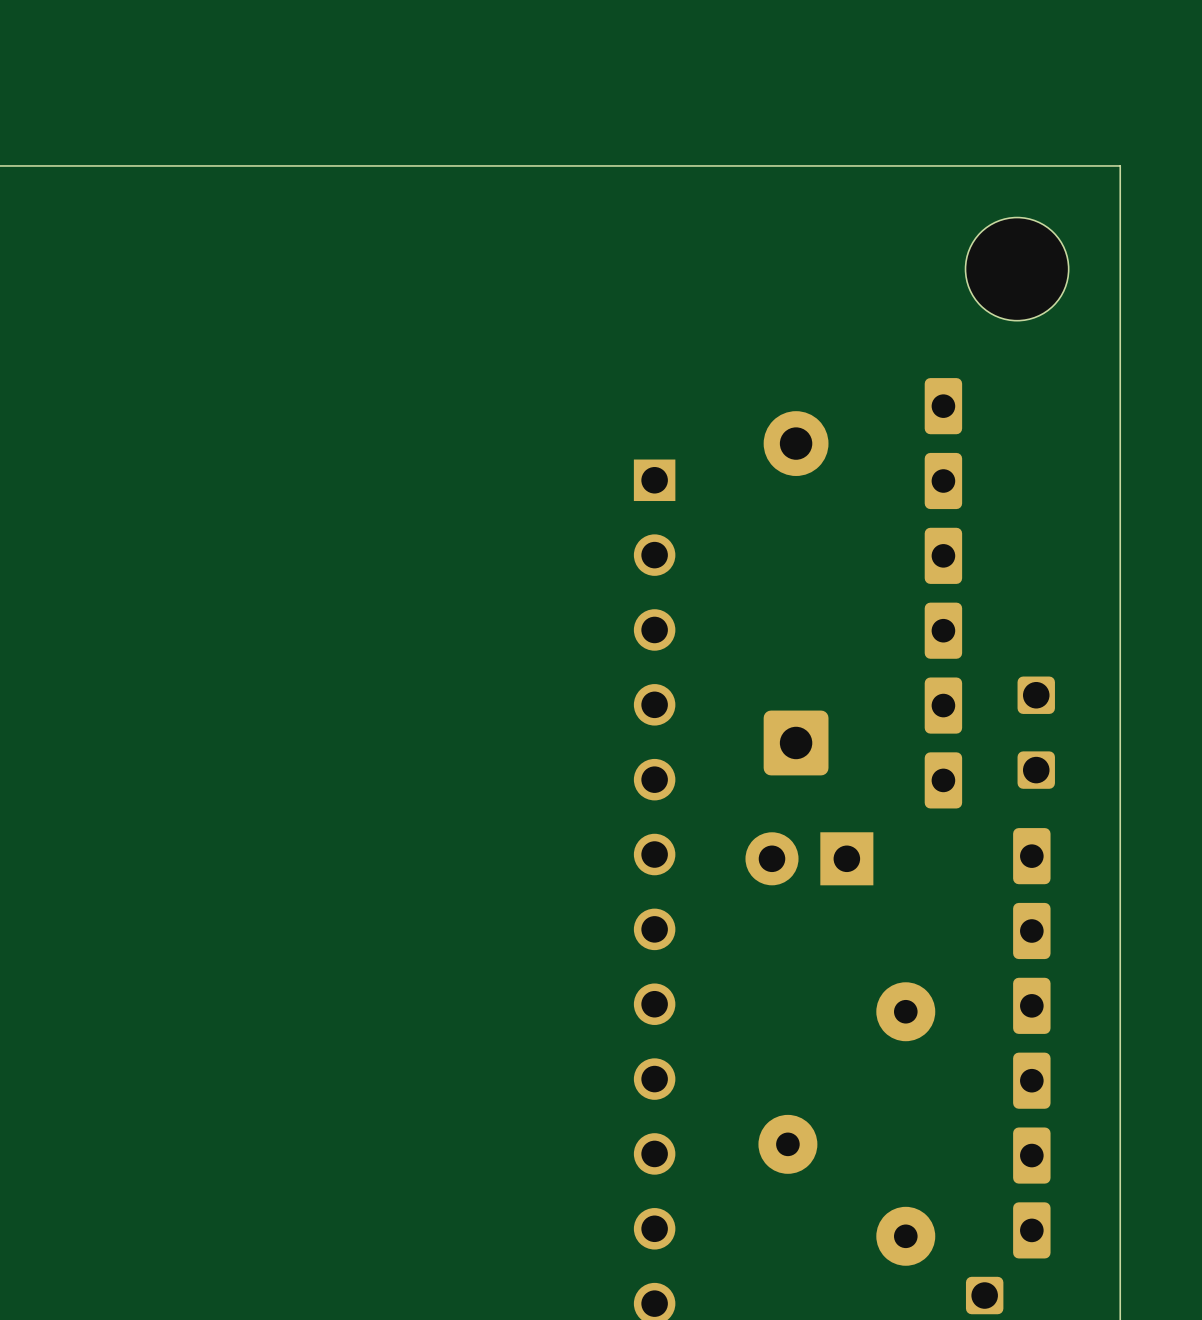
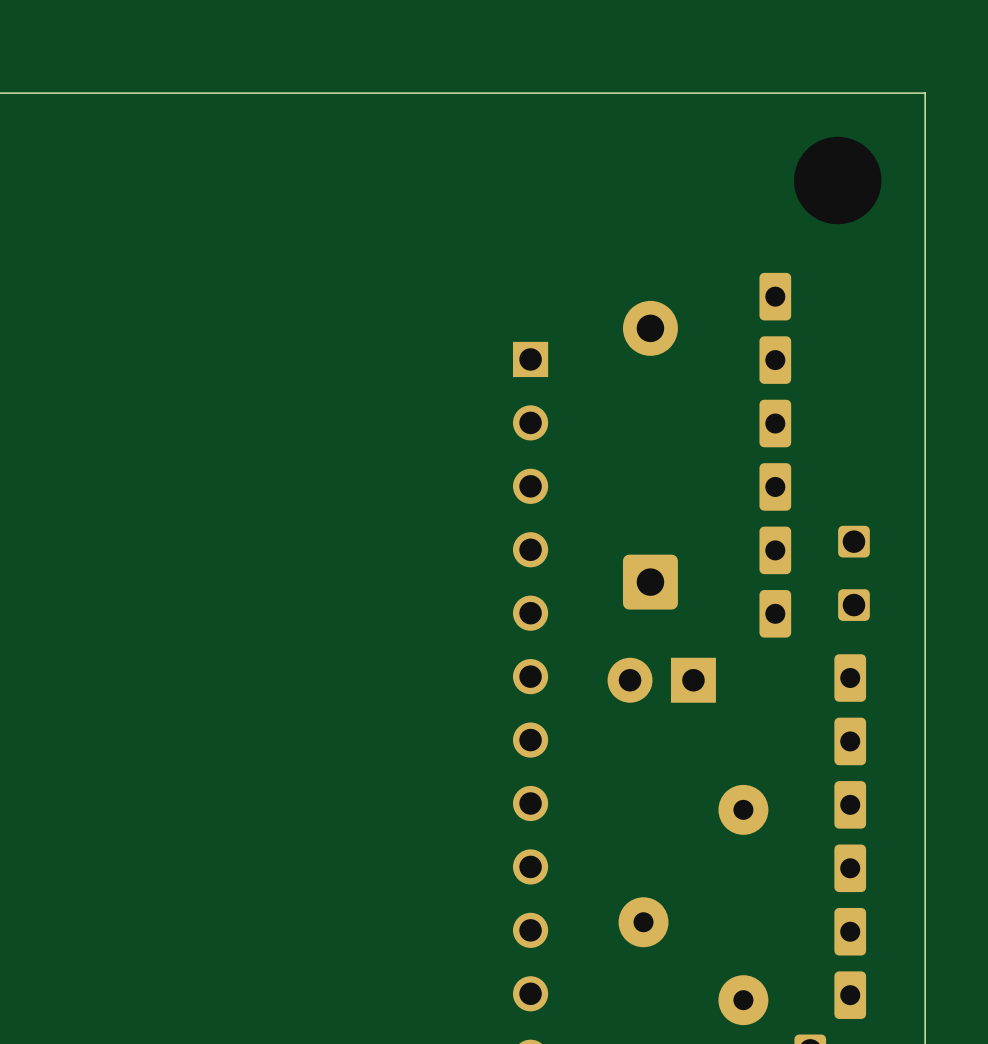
part footprint: [965, 217, 1069, 321] -> [794, 136, 882, 225]

